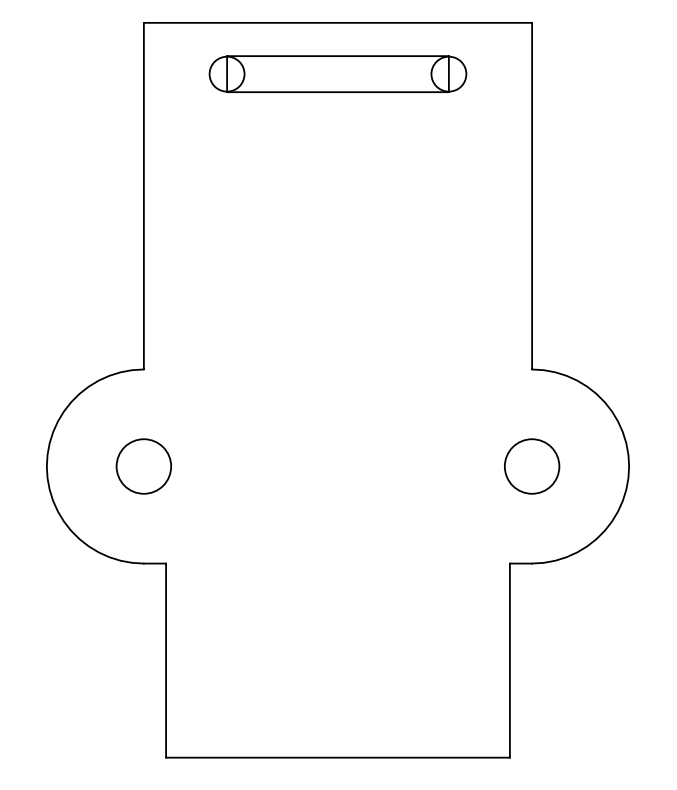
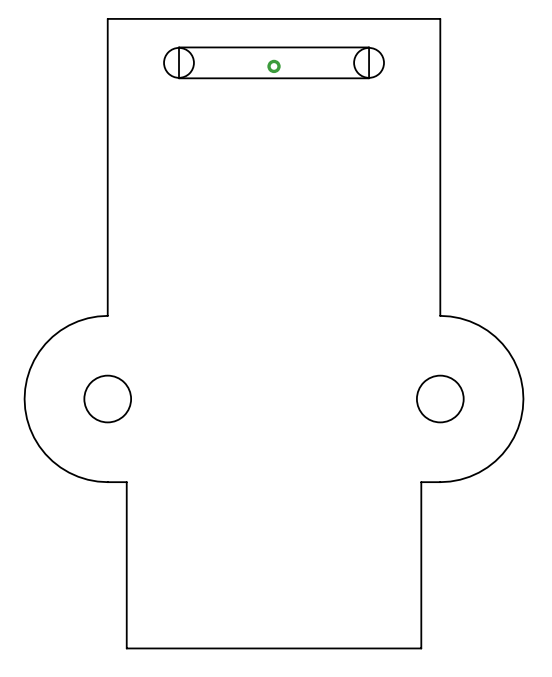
via: none -> (274, 66)

